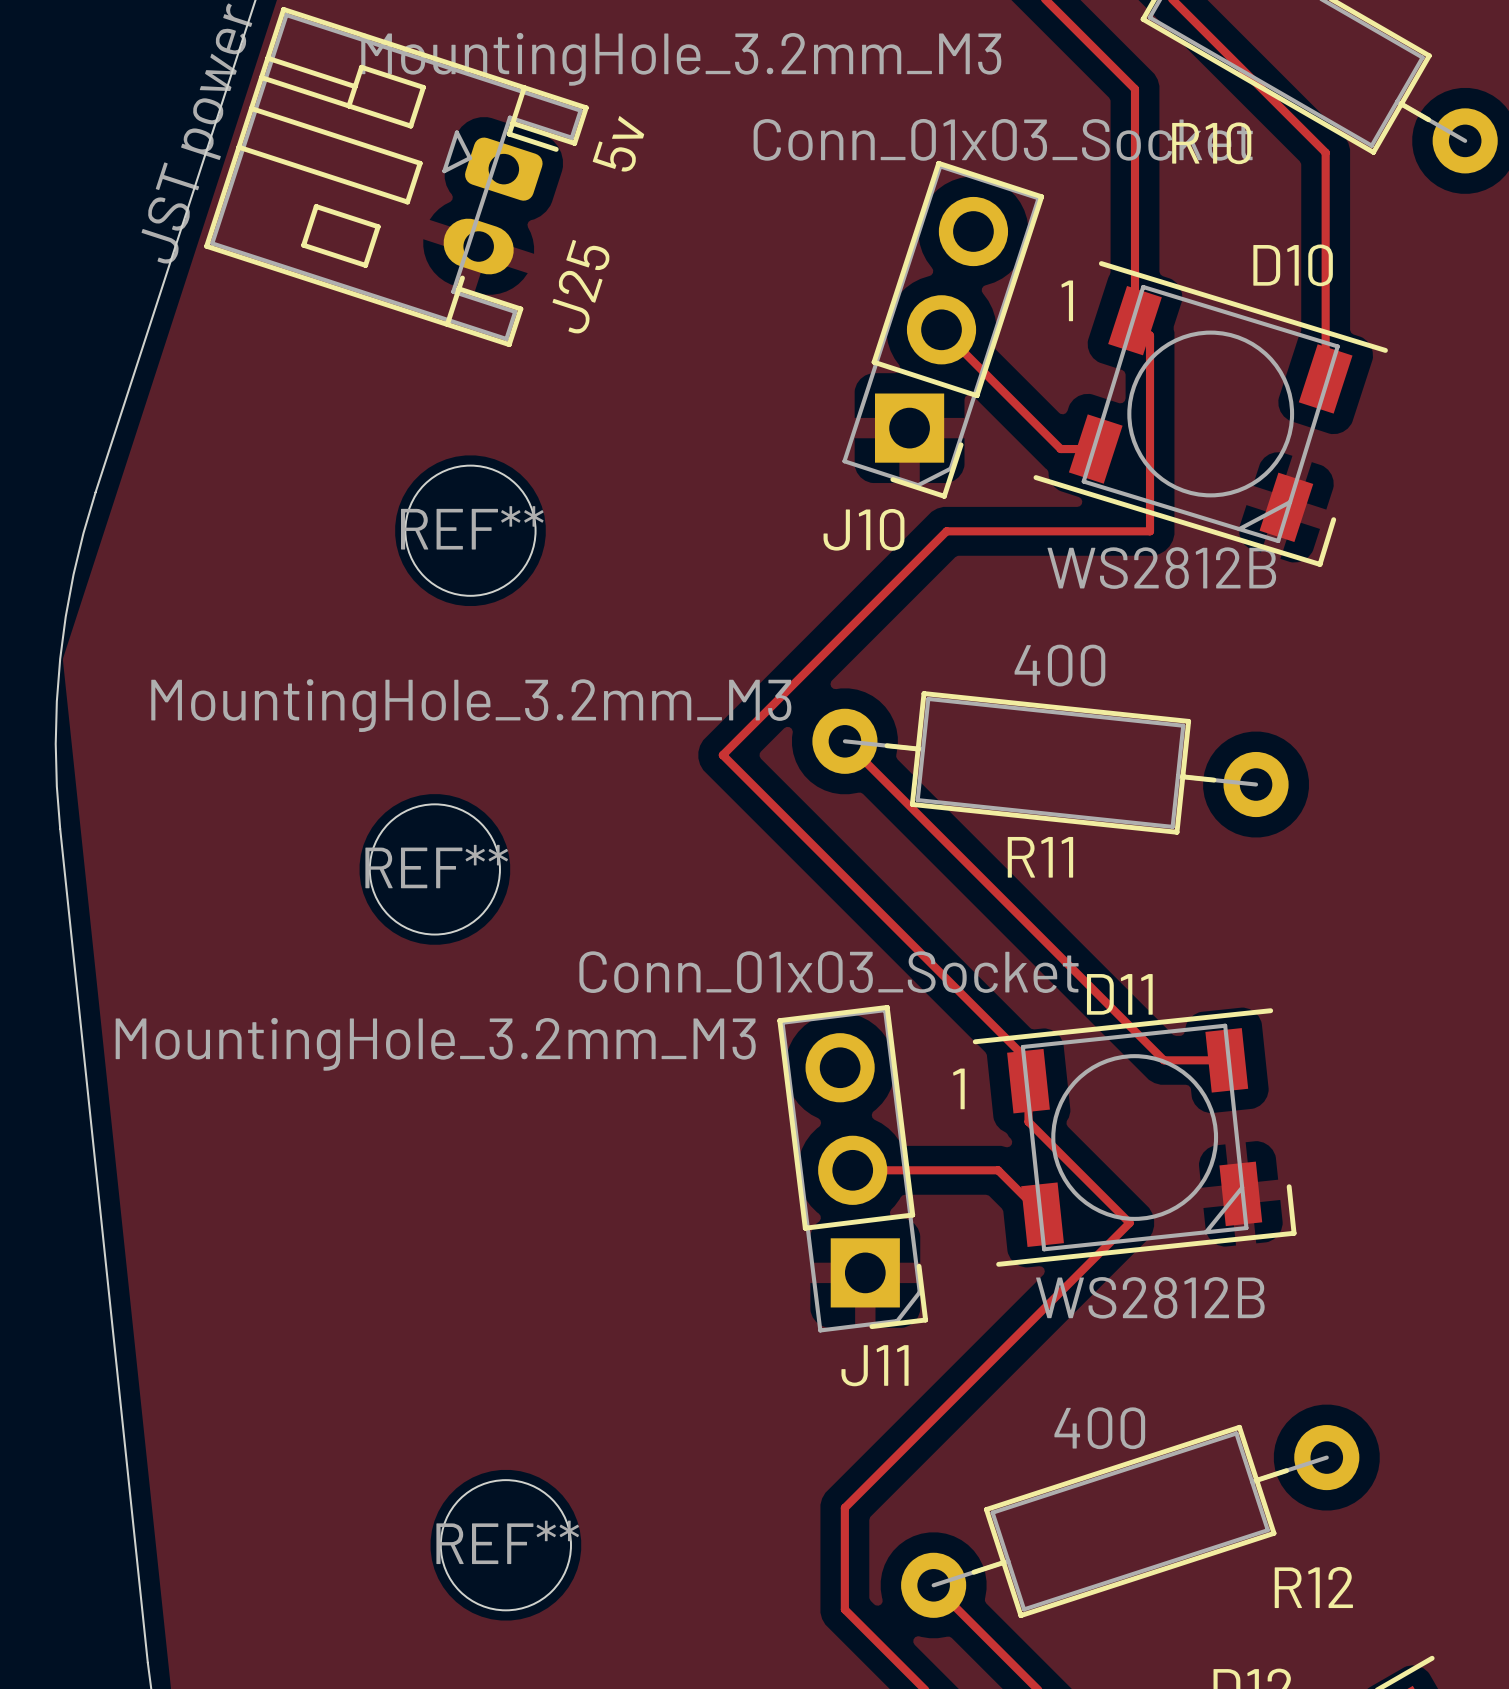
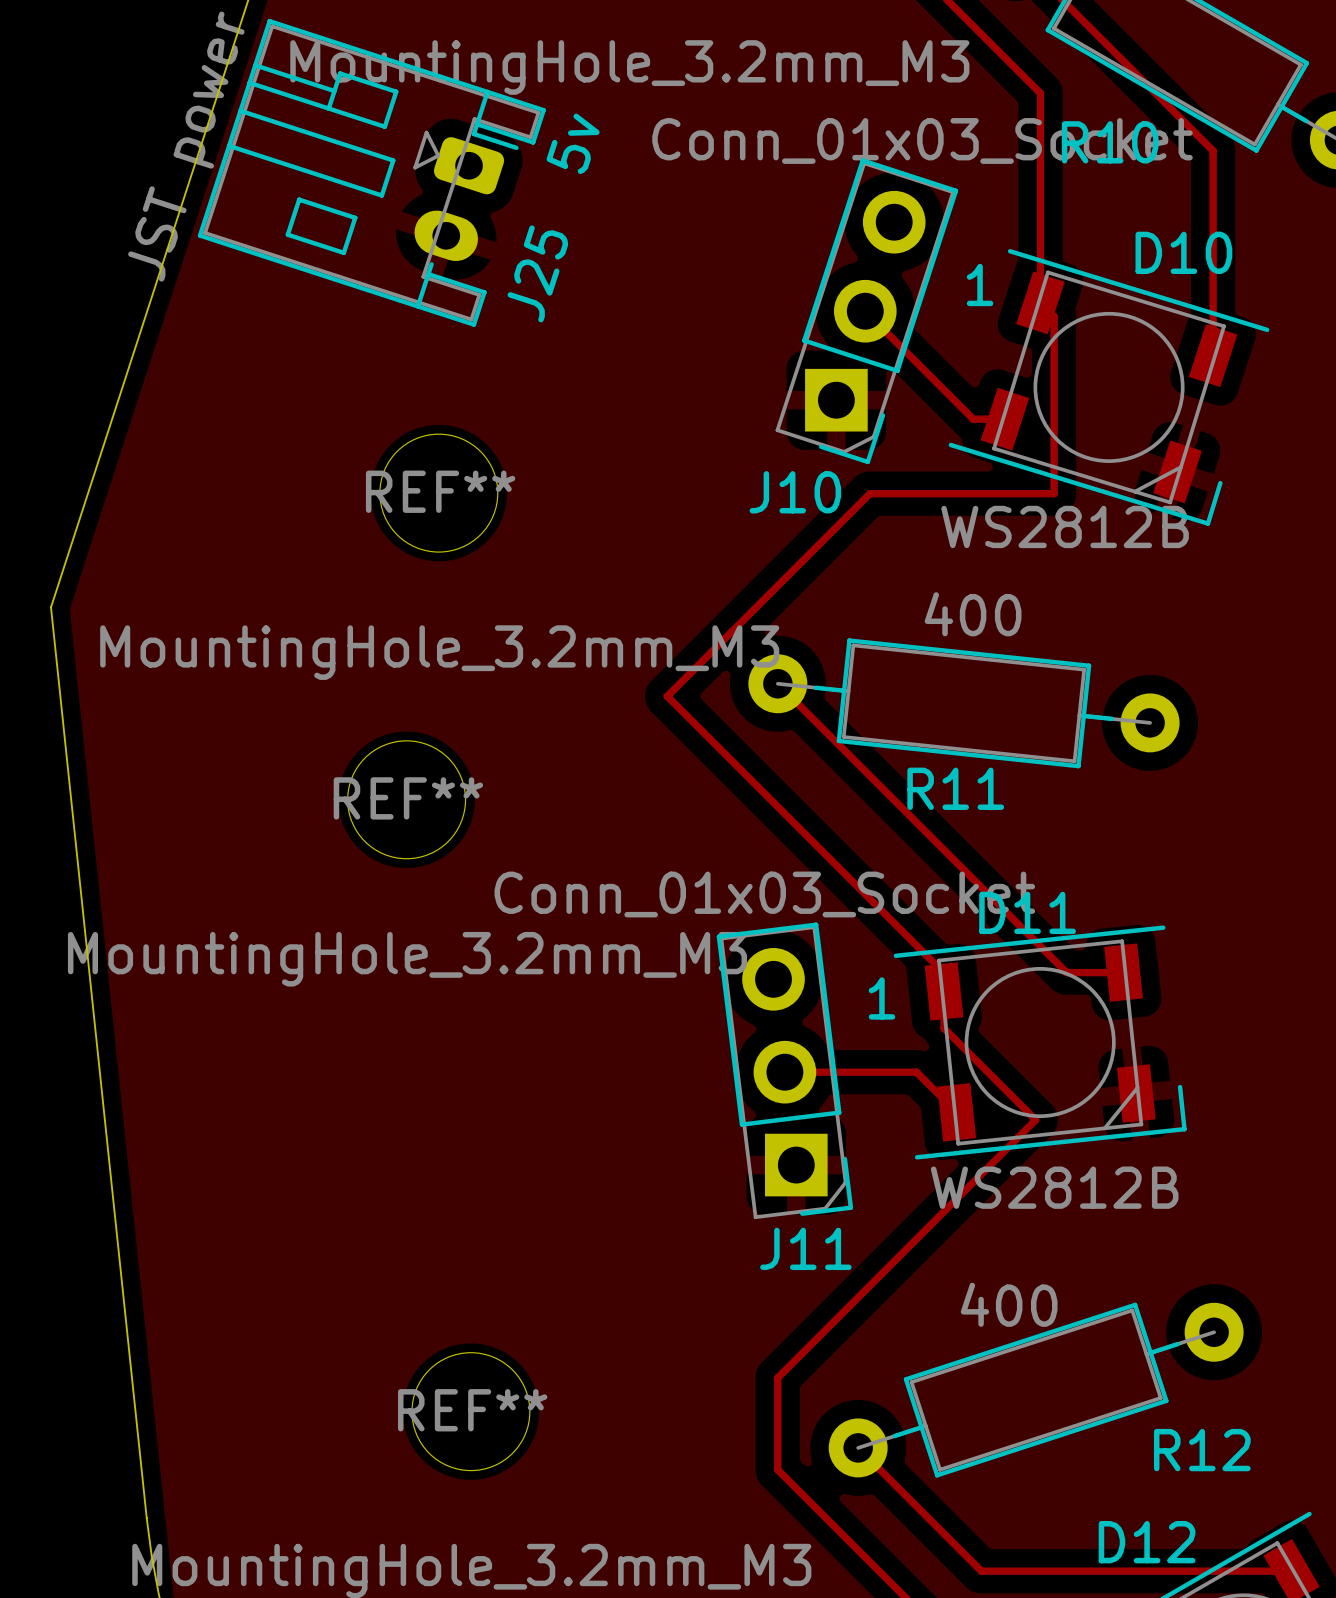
board edge: (95, 492) (73, 574) (60, 658) (55, 743) (60, 828) -> (99, 458) (51, 607) (67, 763)

